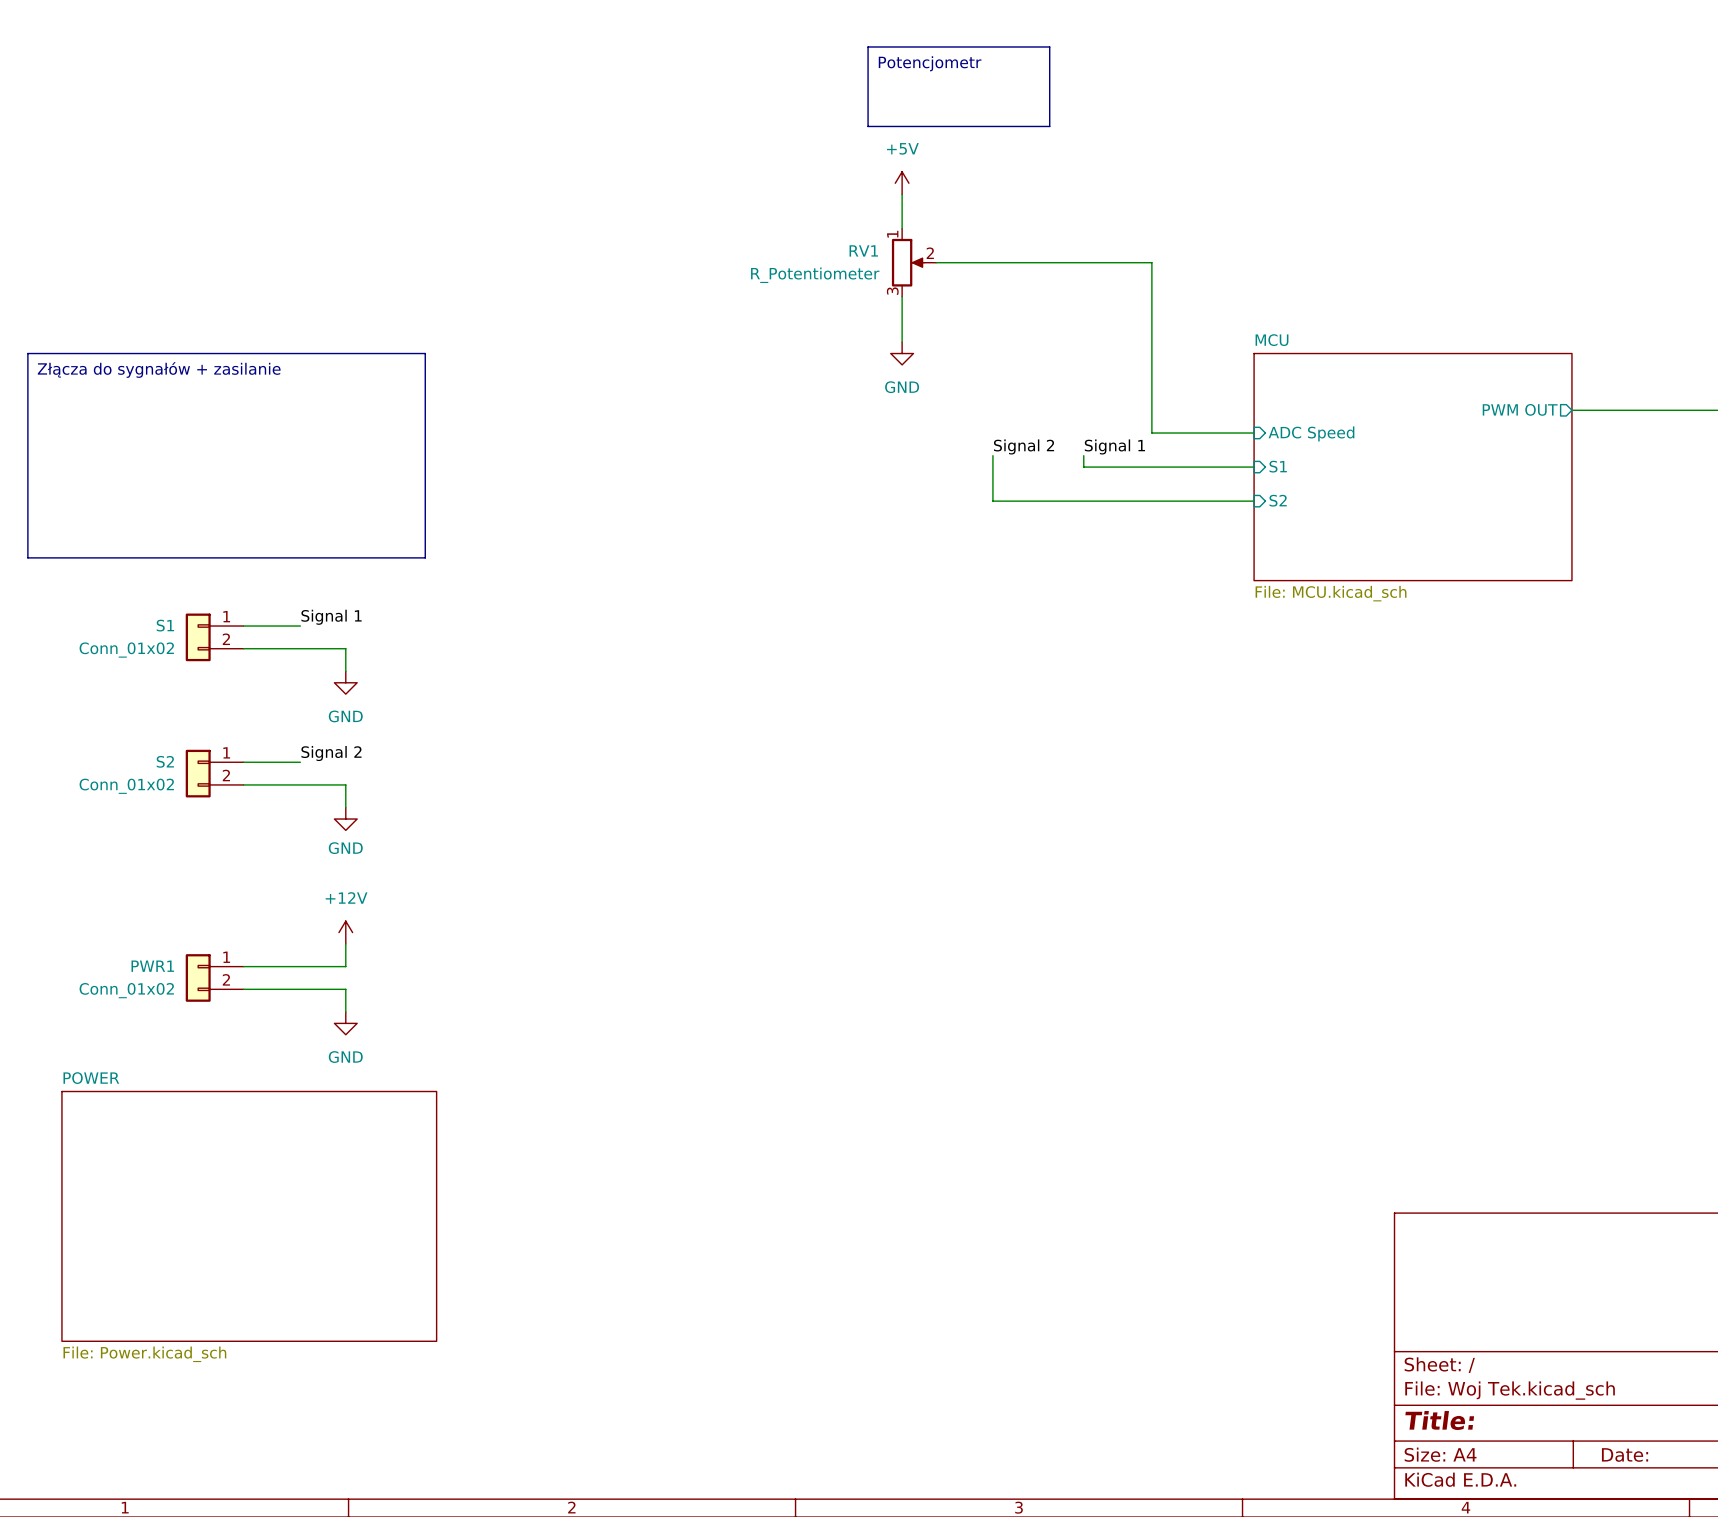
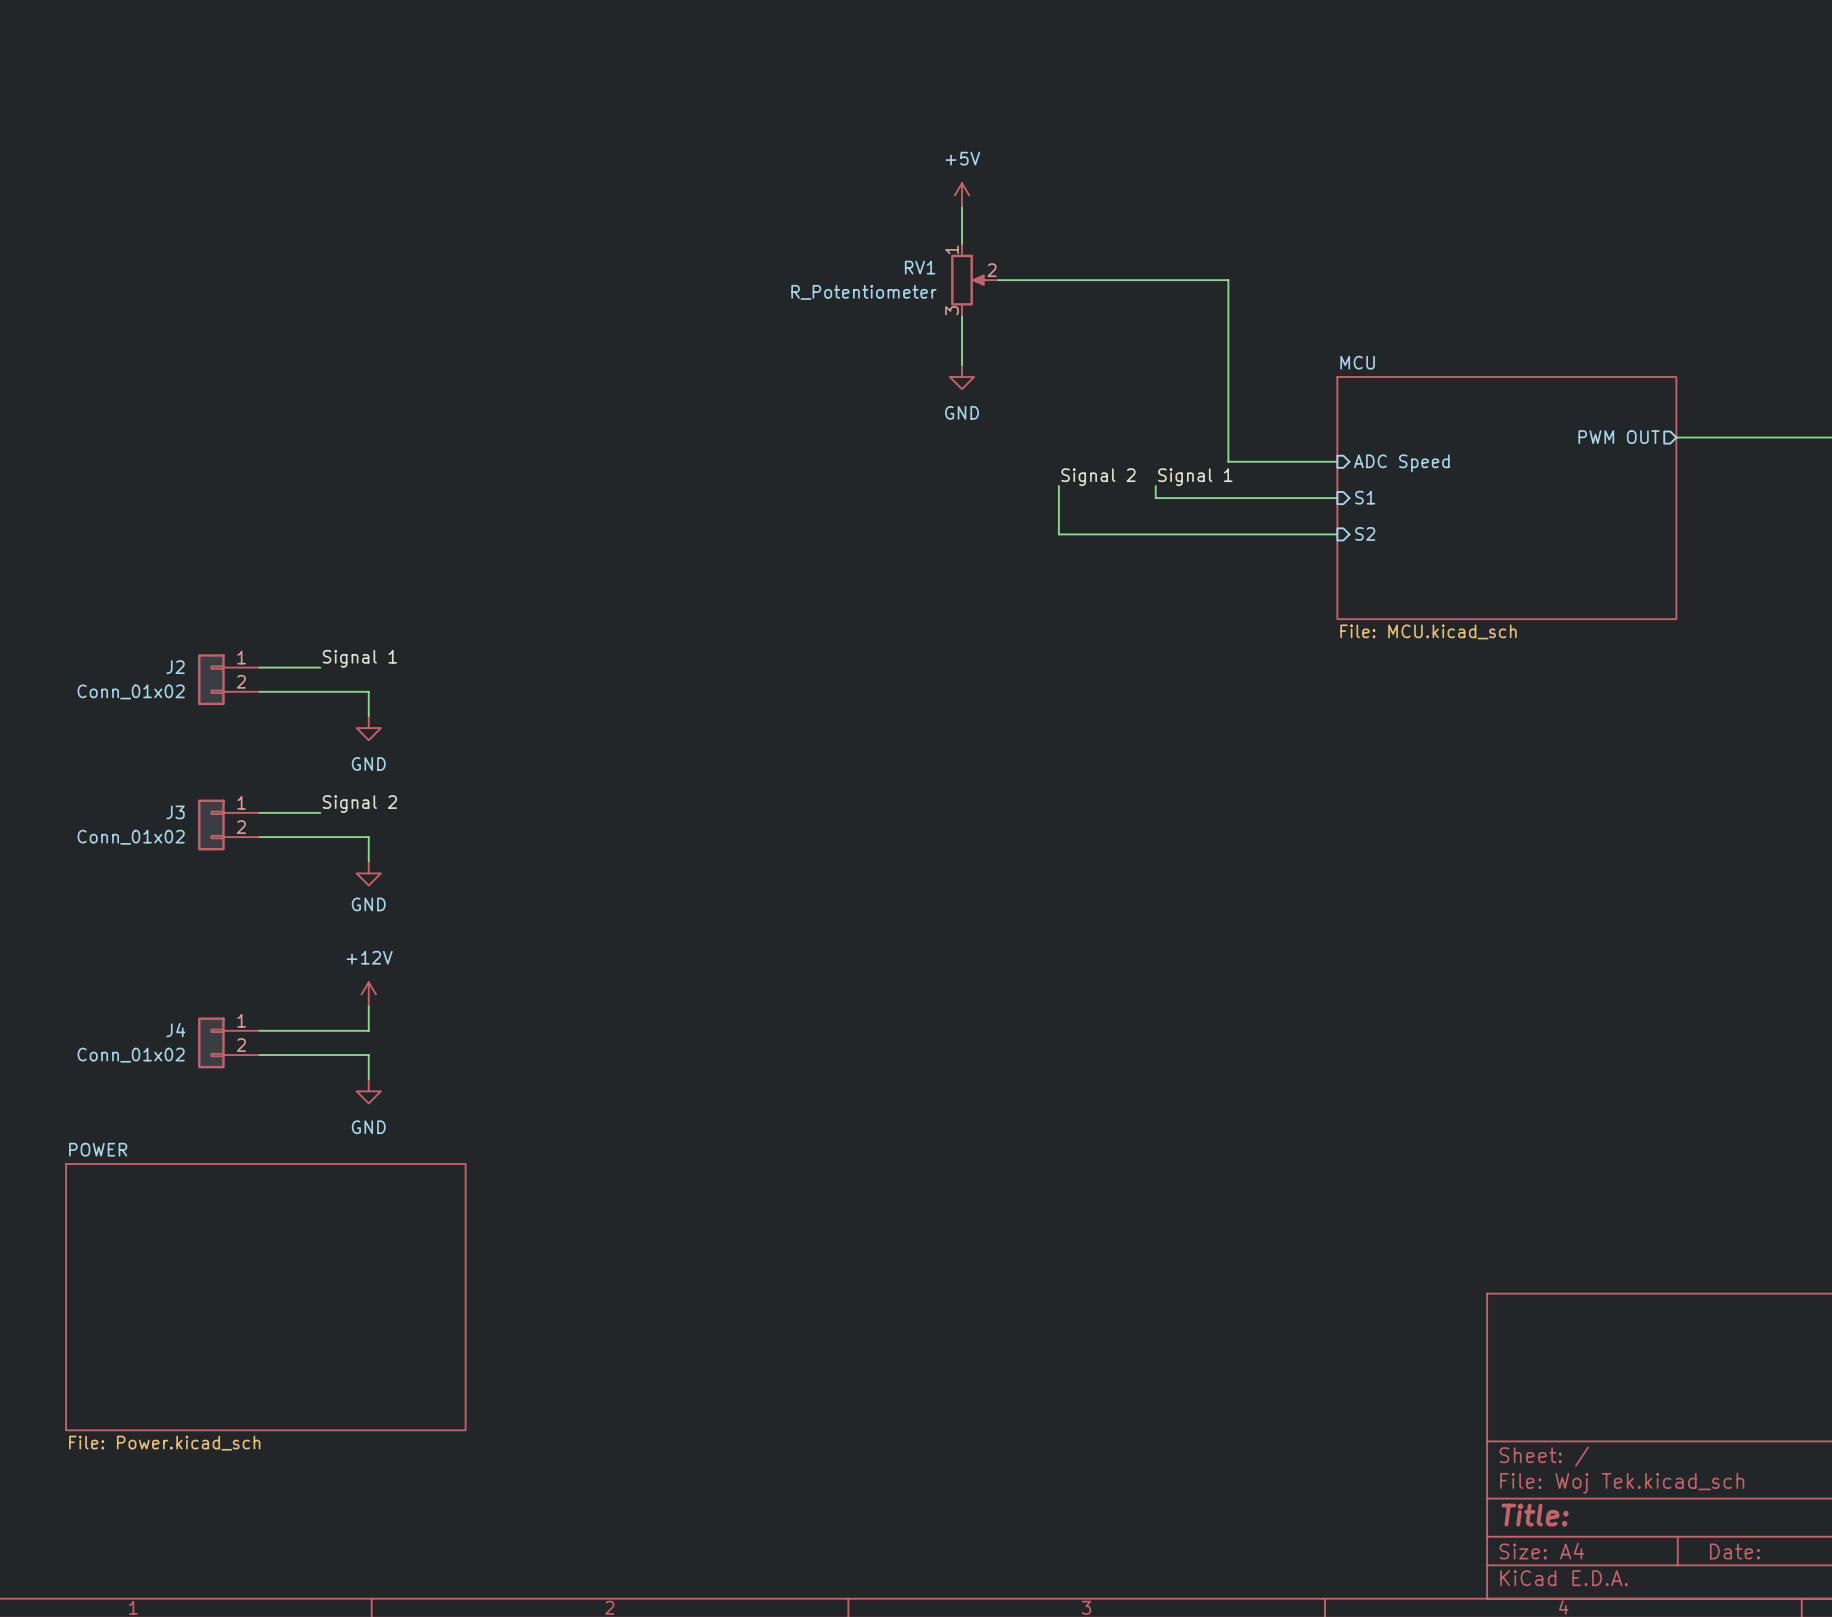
line: (868, 46) (1049, 46) (1049, 126) (868, 126) (868, 46) -> none
text: Potencjometr (930, 63) -> none
line: (27, 353) (425, 353) (425, 557) (27, 557) (27, 353) -> none
text: Złącza do sygnałów + zasilanie (159, 370) -> none
S1 name: S1 (165, 625) -> J2 (175, 667)
S2 name: S2 (165, 761) -> J3 (175, 812)
PWR1 name: PWR1 (152, 966) -> J4 (175, 1030)

